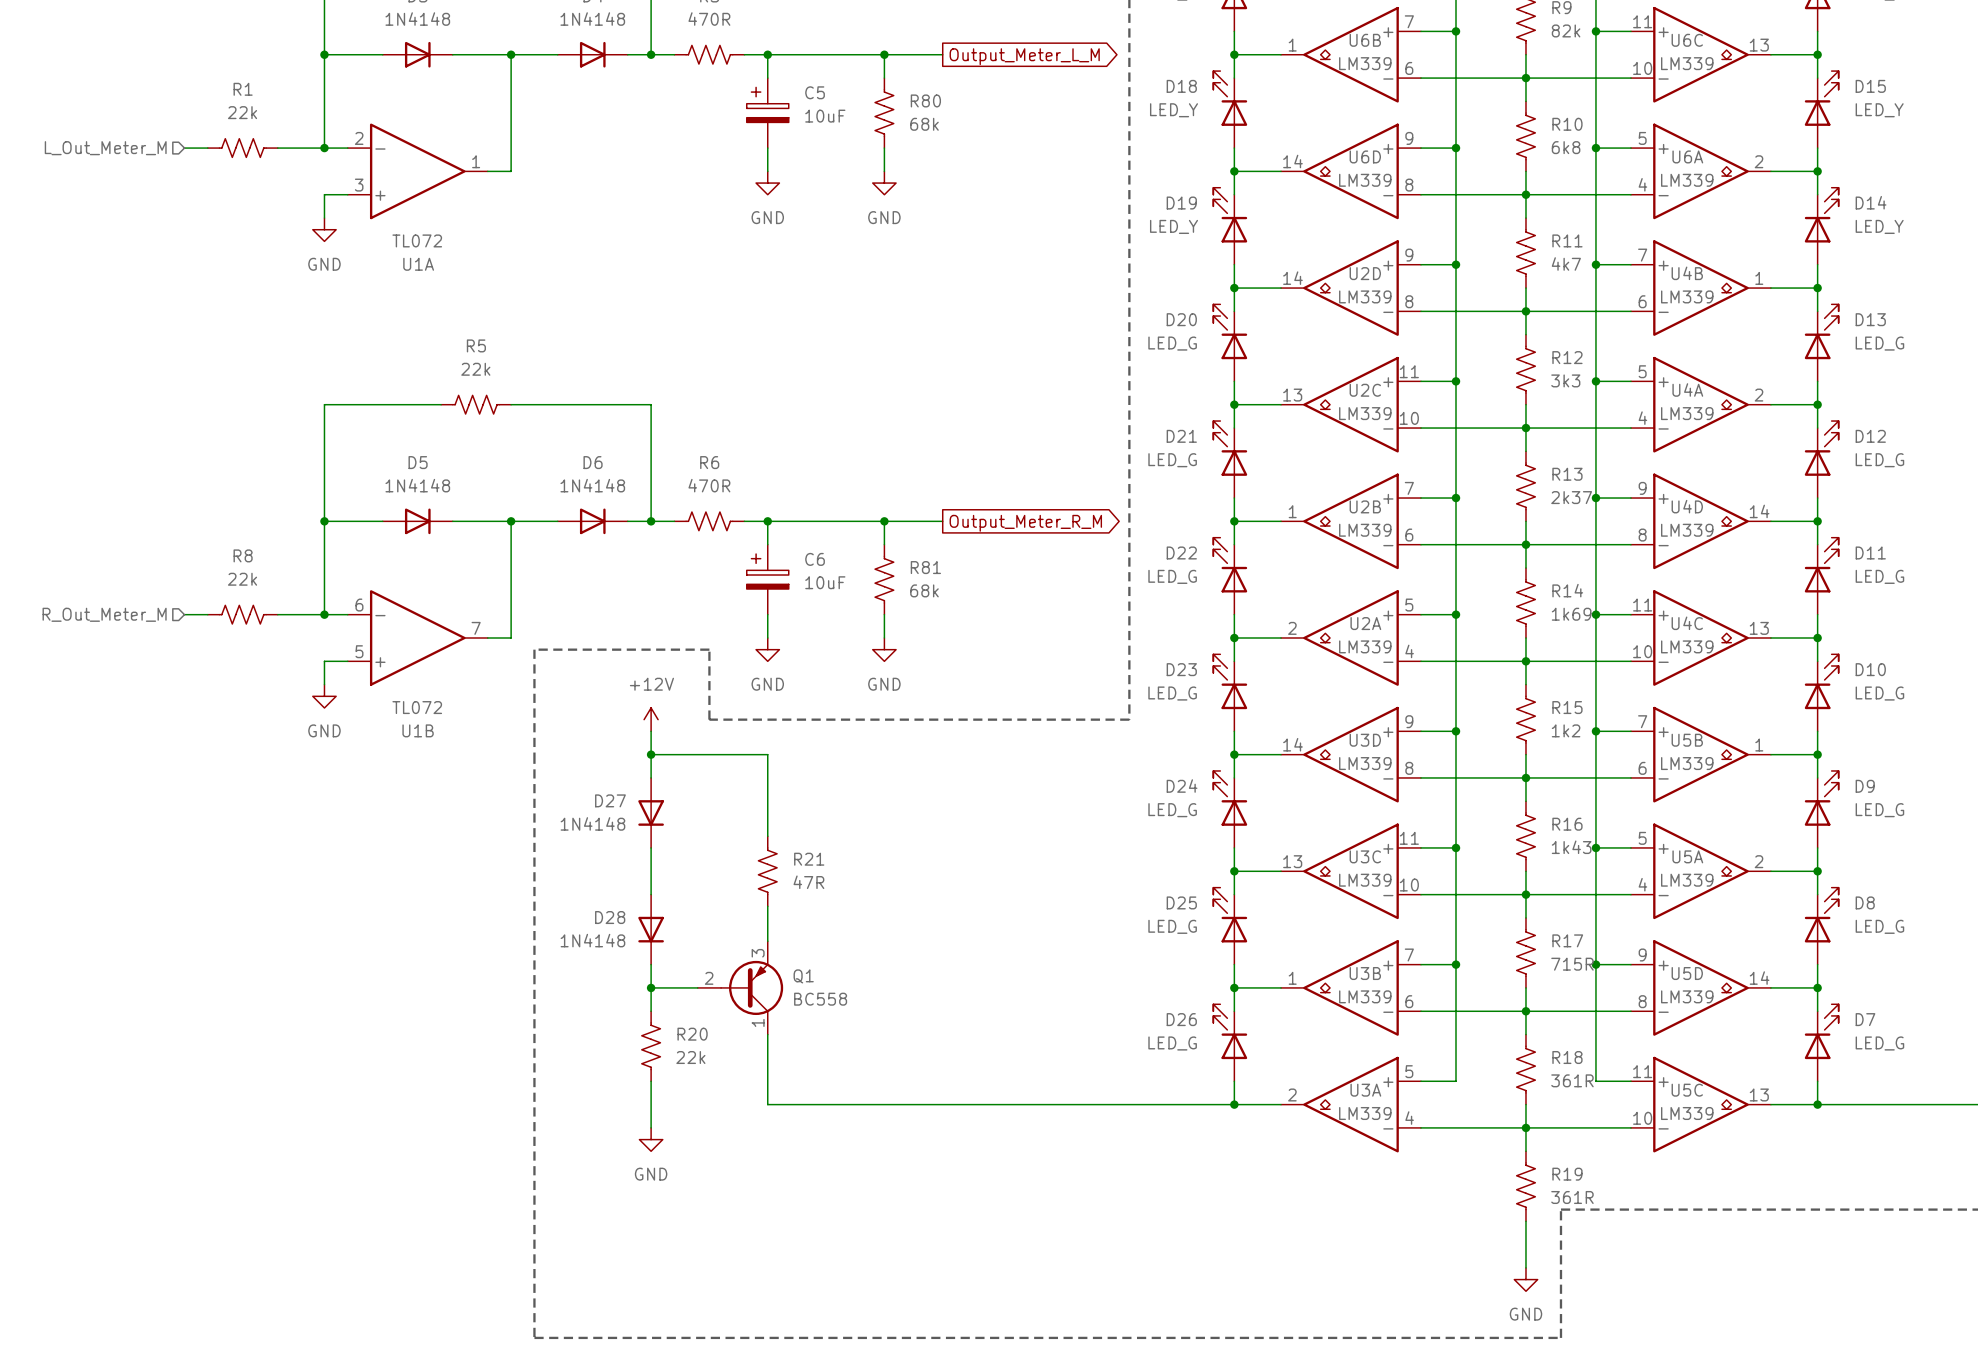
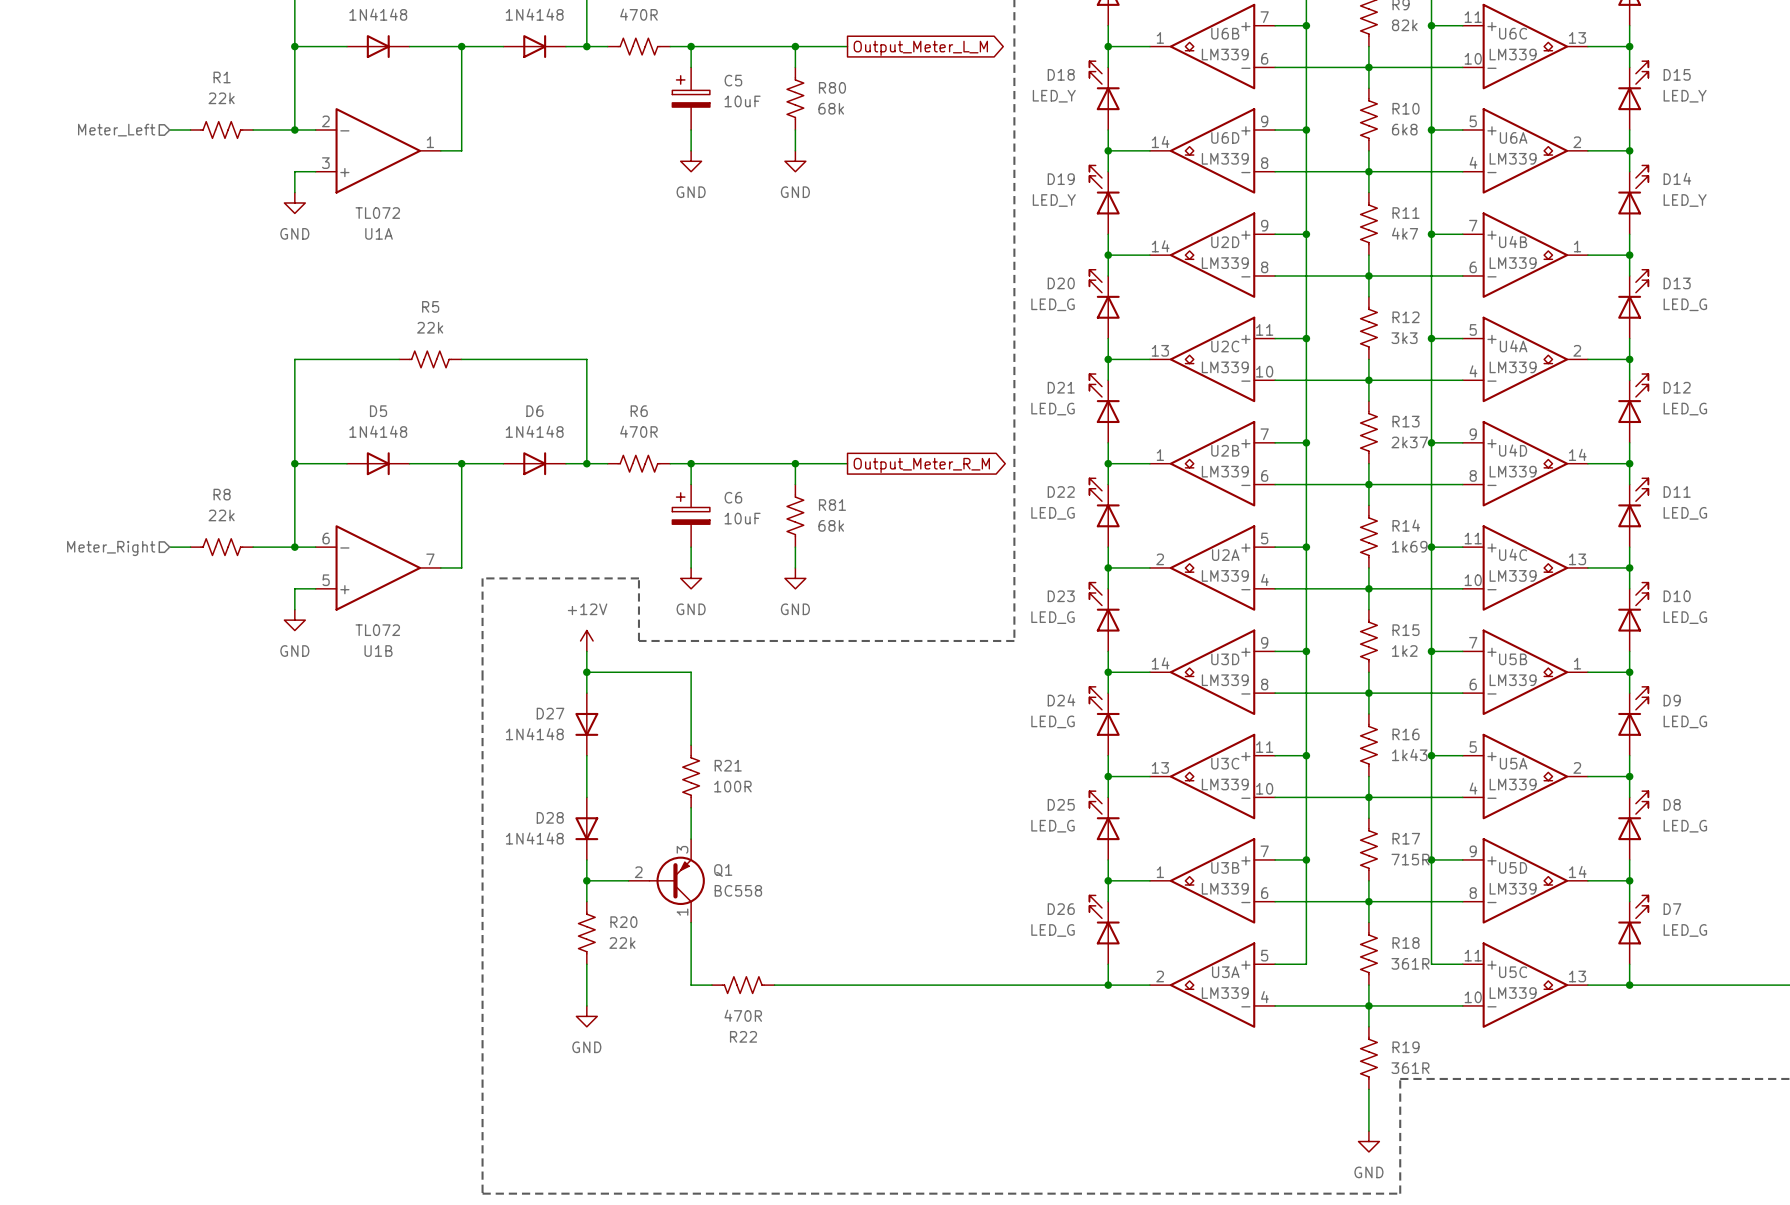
hierarchical label: L_Out_Meter_M (105, 148) -> Meter_Left (116, 130)
hierarchical label: R_Out_Meter_M (104, 614) -> Meter_Right (111, 548)
R21 value: 47R (808, 882) -> 100R (732, 786)
R22: none -> 470R (743, 985)

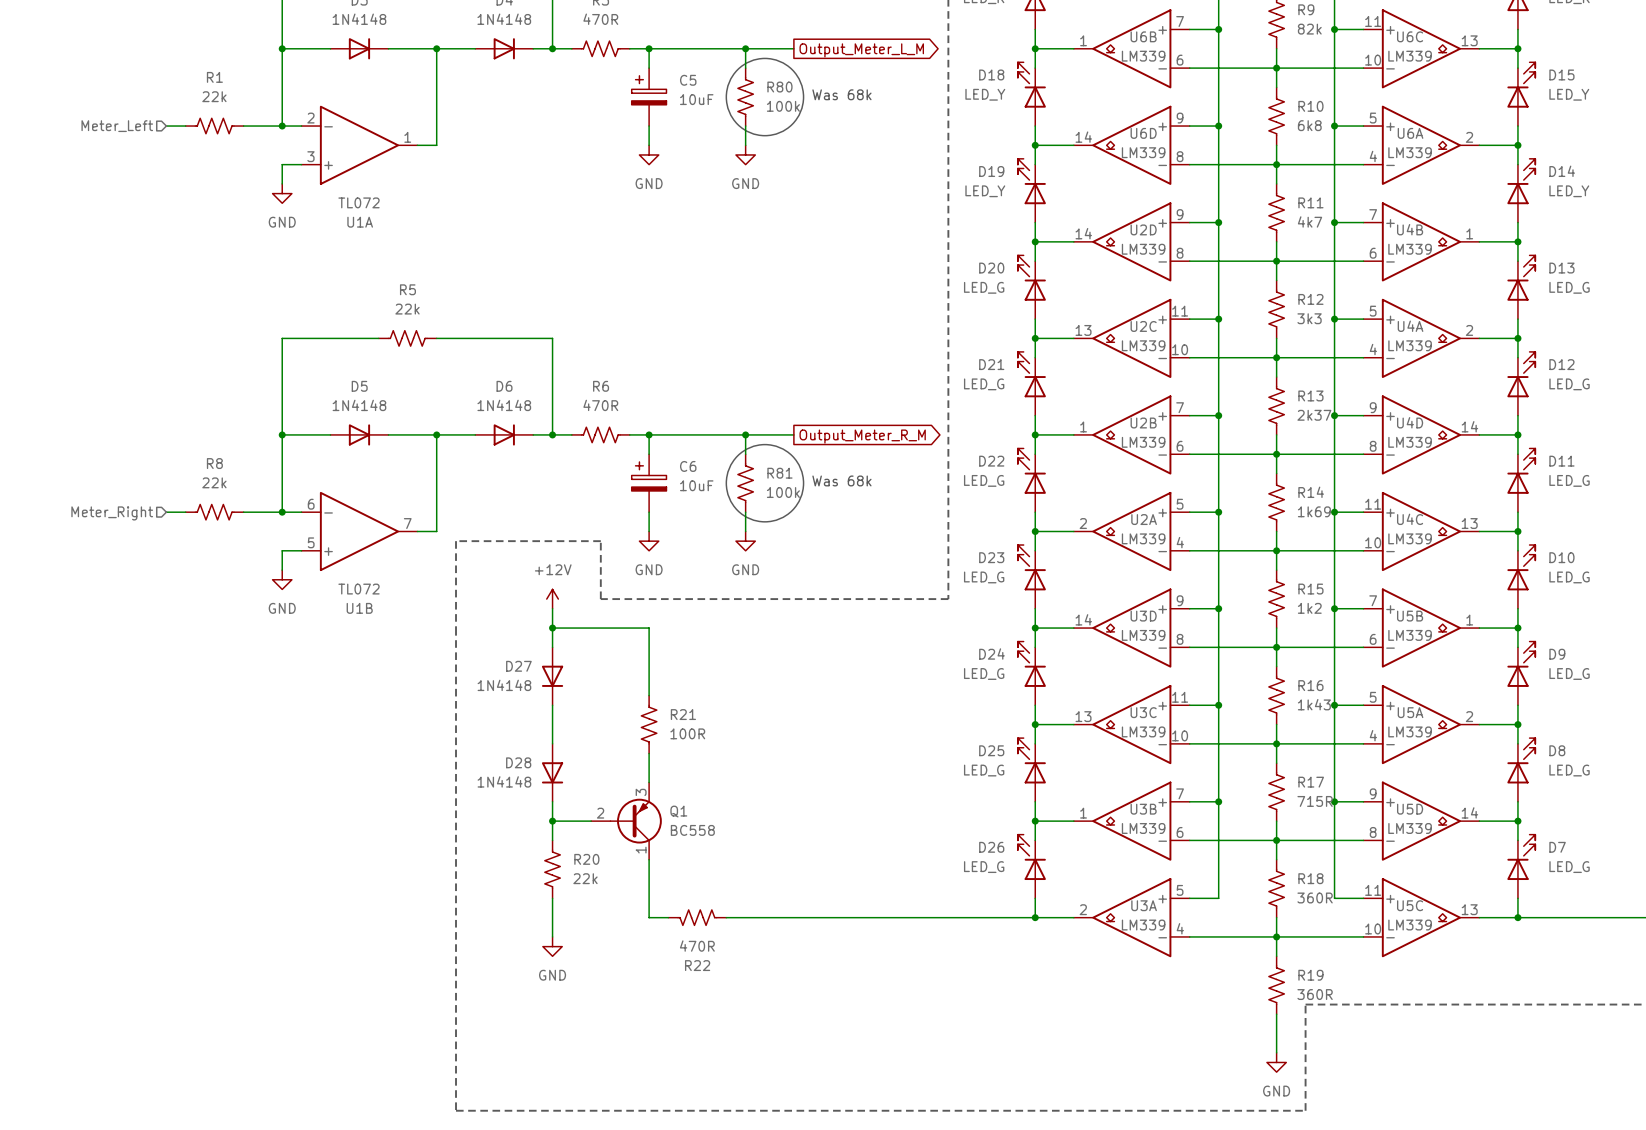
drawing: none -> [726, 58, 804, 136]
text: none -> Was 68k (841, 94)
R80 value: 68k (831, 108) -> 100k (783, 106)
drawing: none -> [726, 444, 804, 522]
text: none -> Was 68k (841, 480)
R81 value: 68k (831, 525) -> 100k (783, 492)
R18 value: 361R (1410, 963) -> 360R (1315, 897)
R19 value: 361R (1410, 1068) -> 360R (1315, 994)

